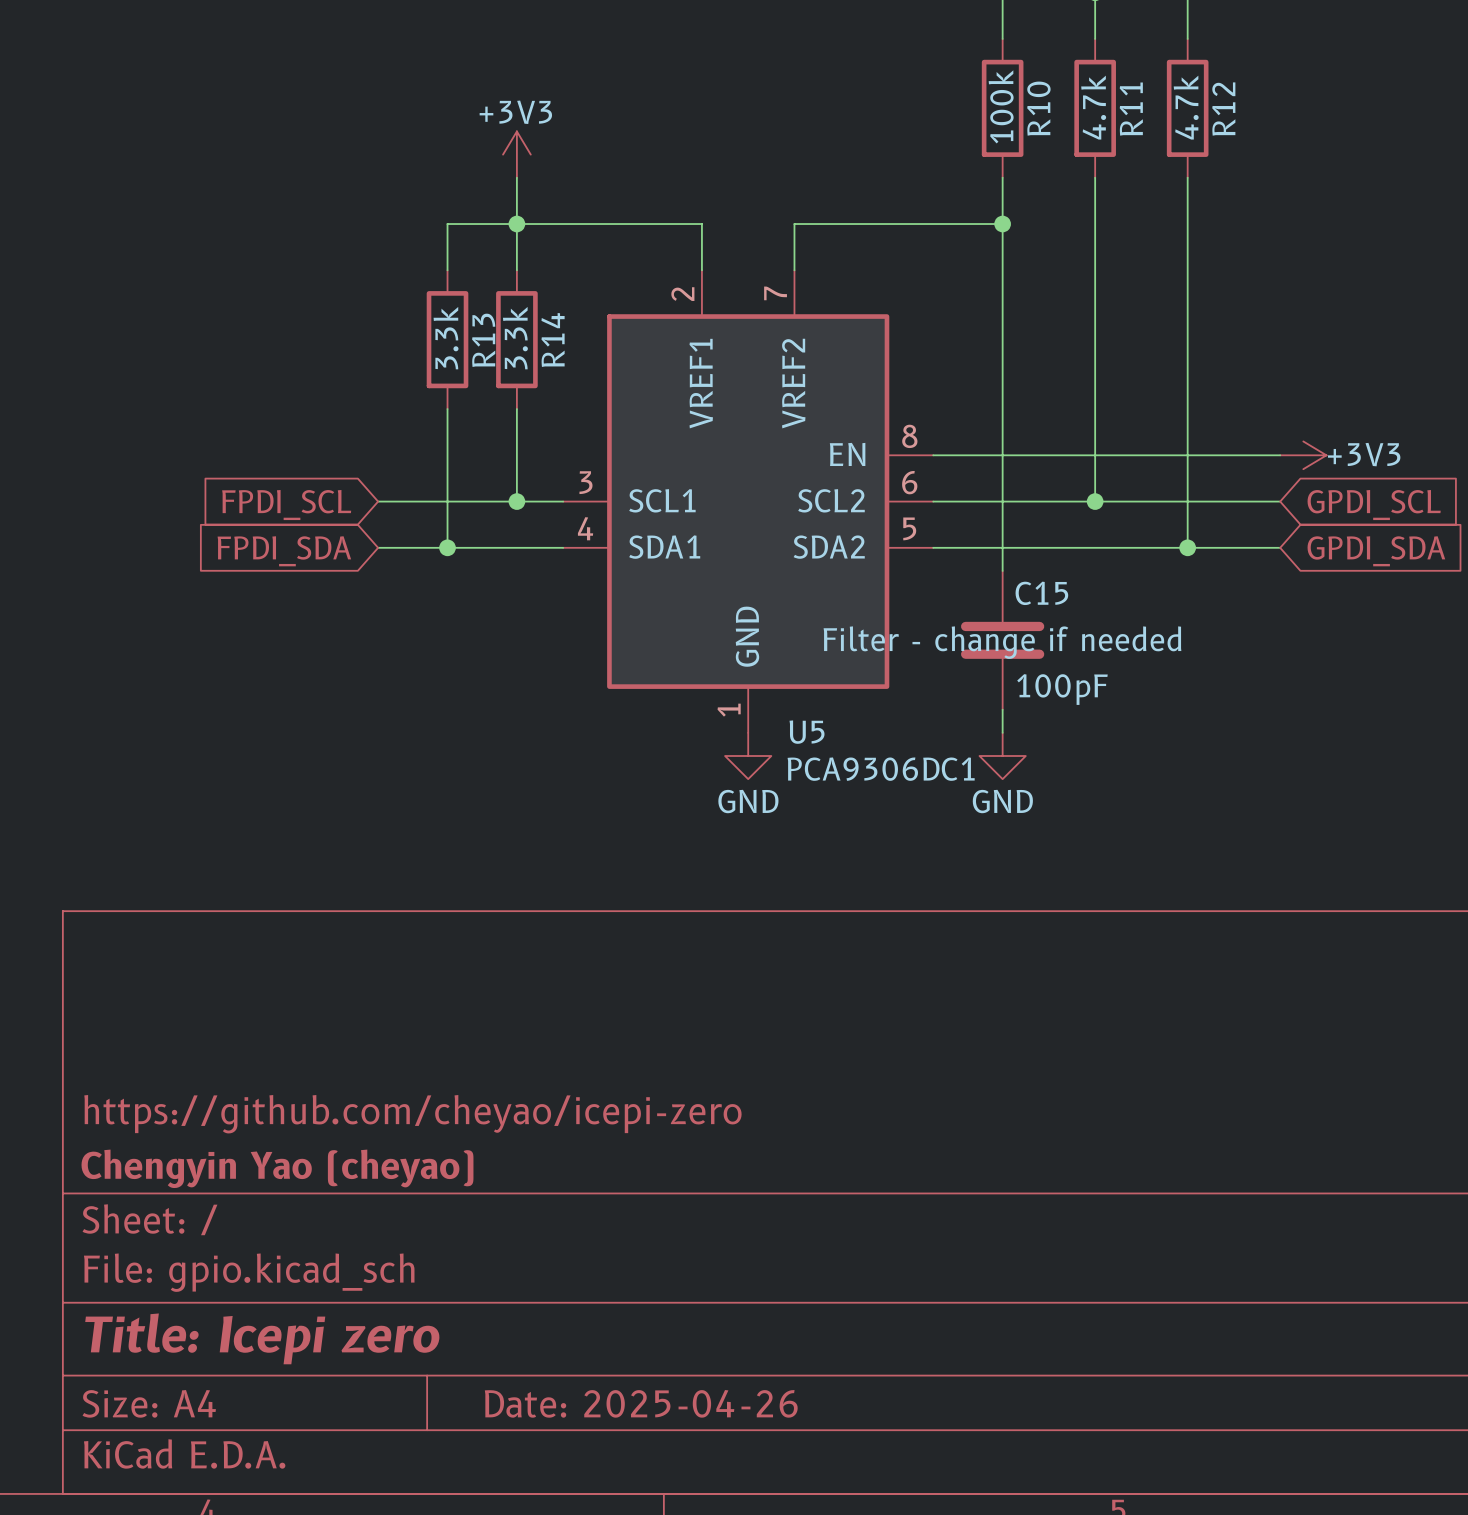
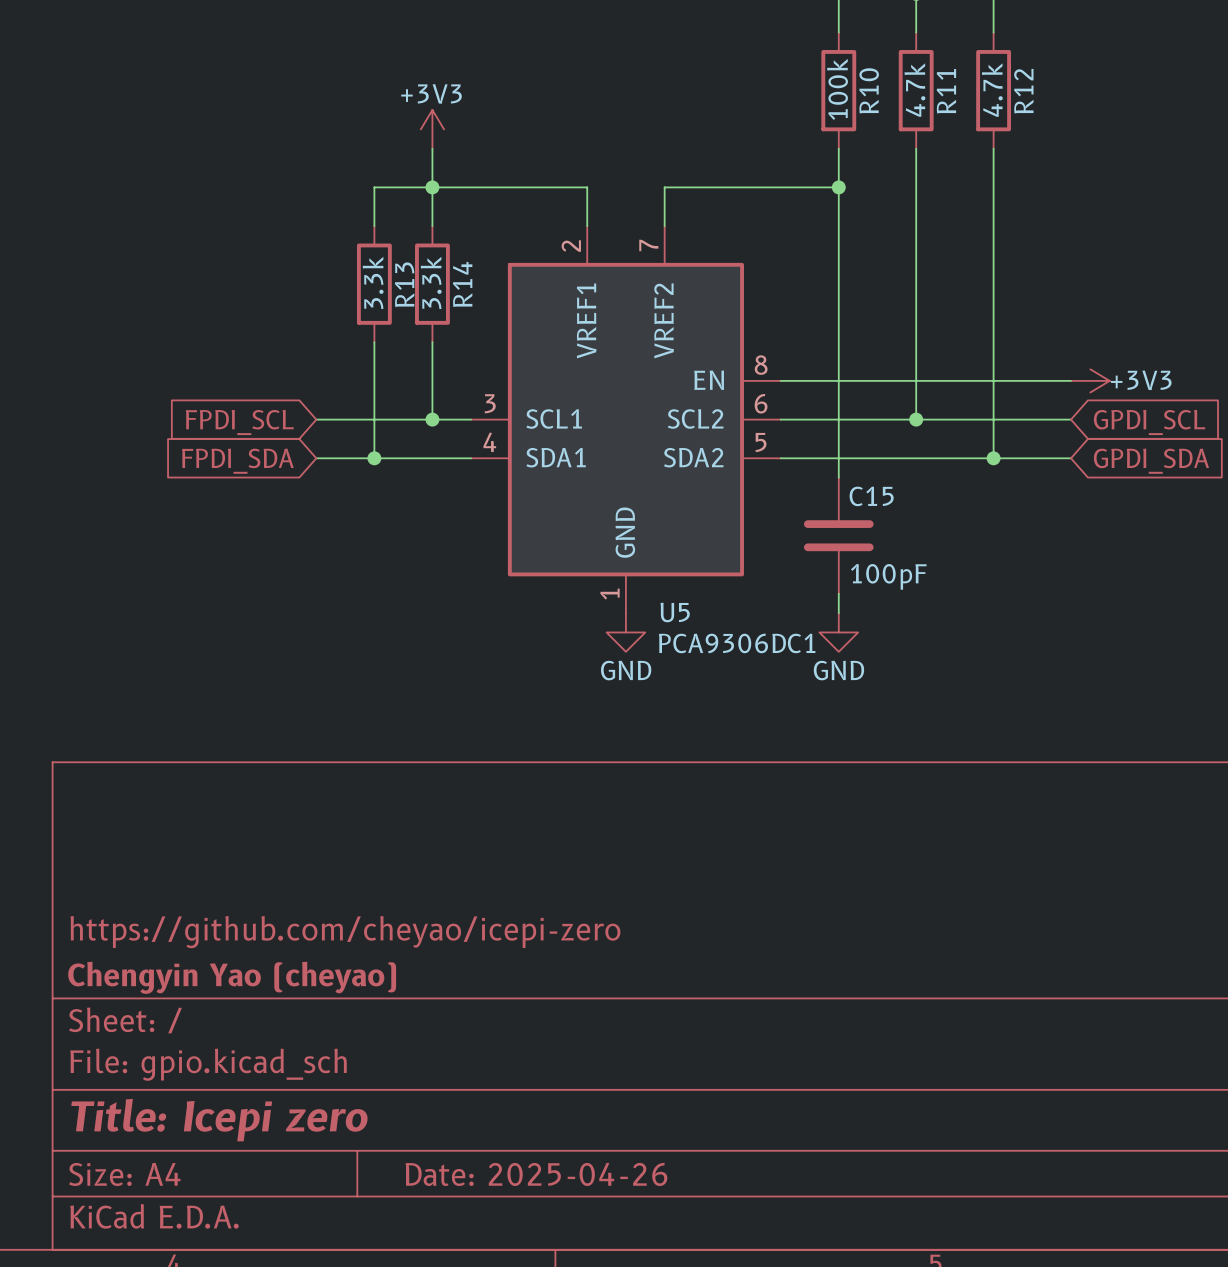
C15 text: Filter - change if needed (1002, 642) -> none

